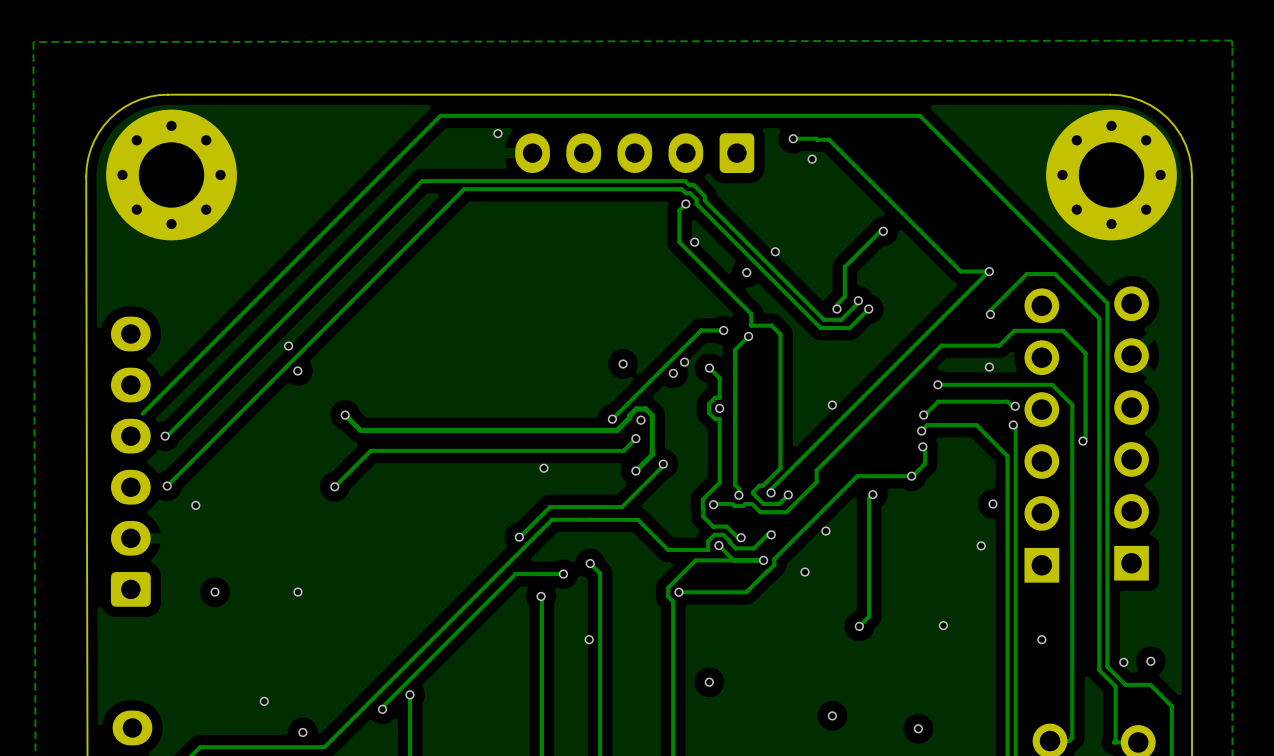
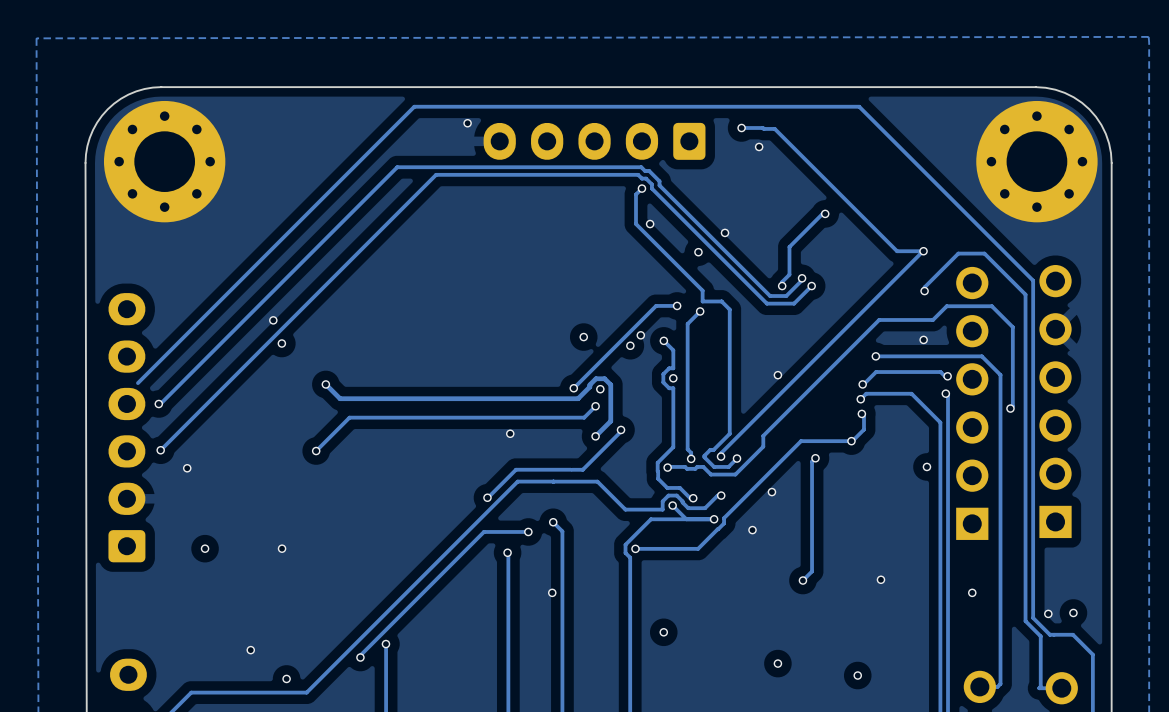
via: (981, 545) -> none

